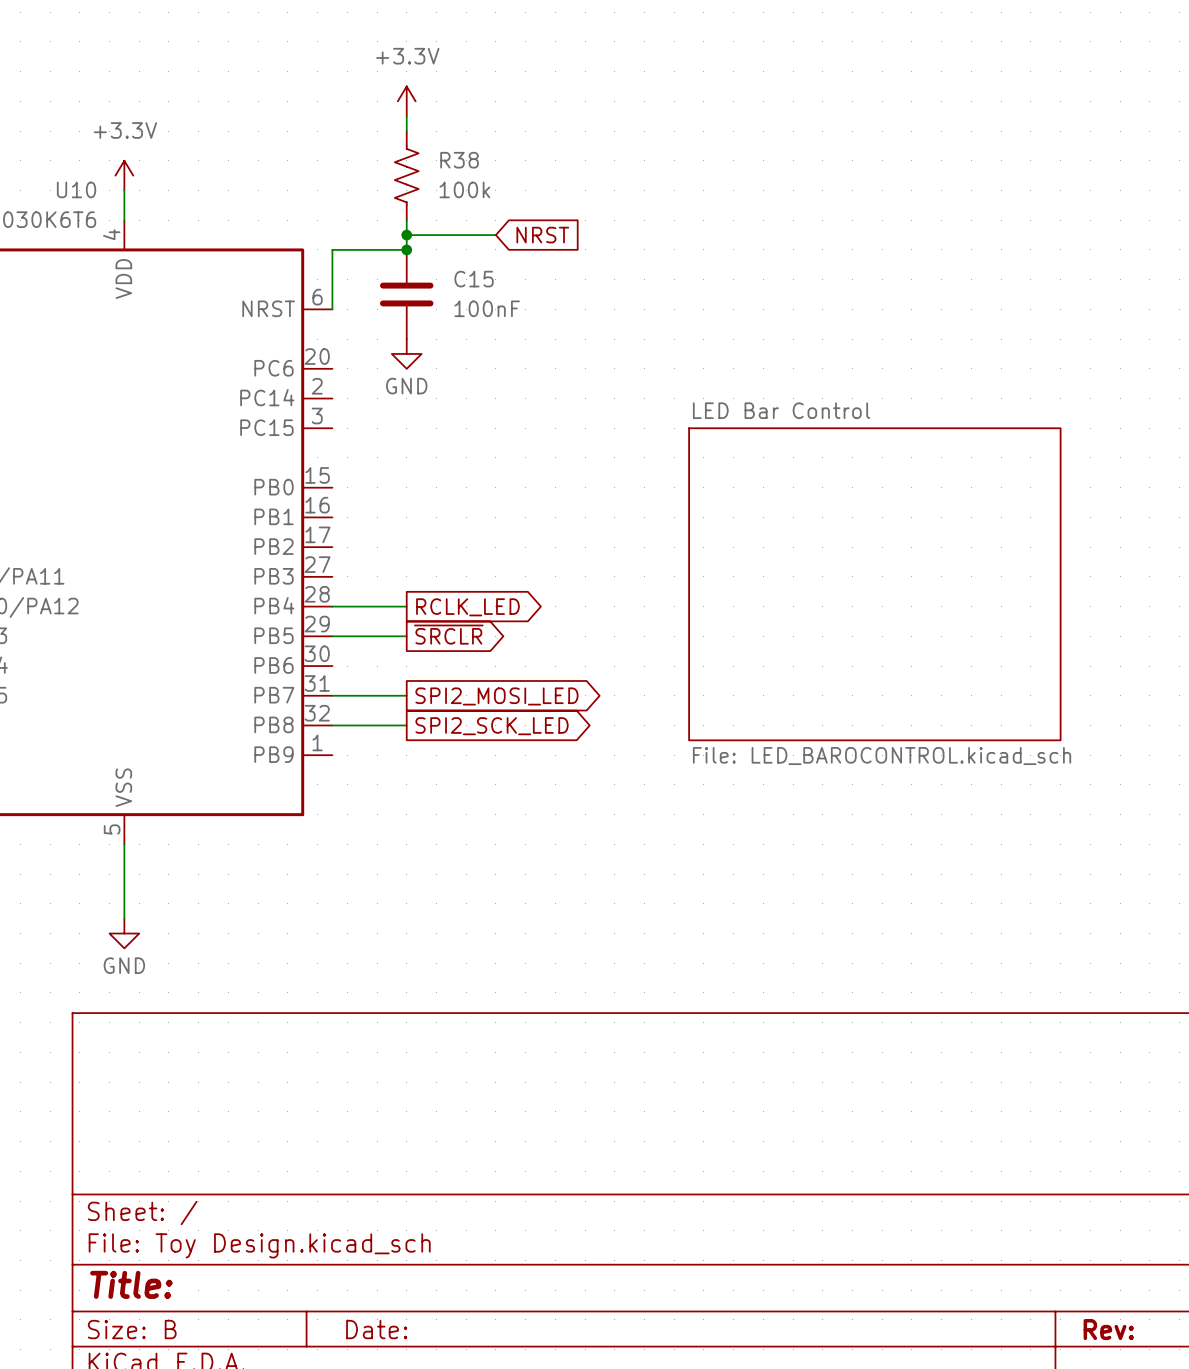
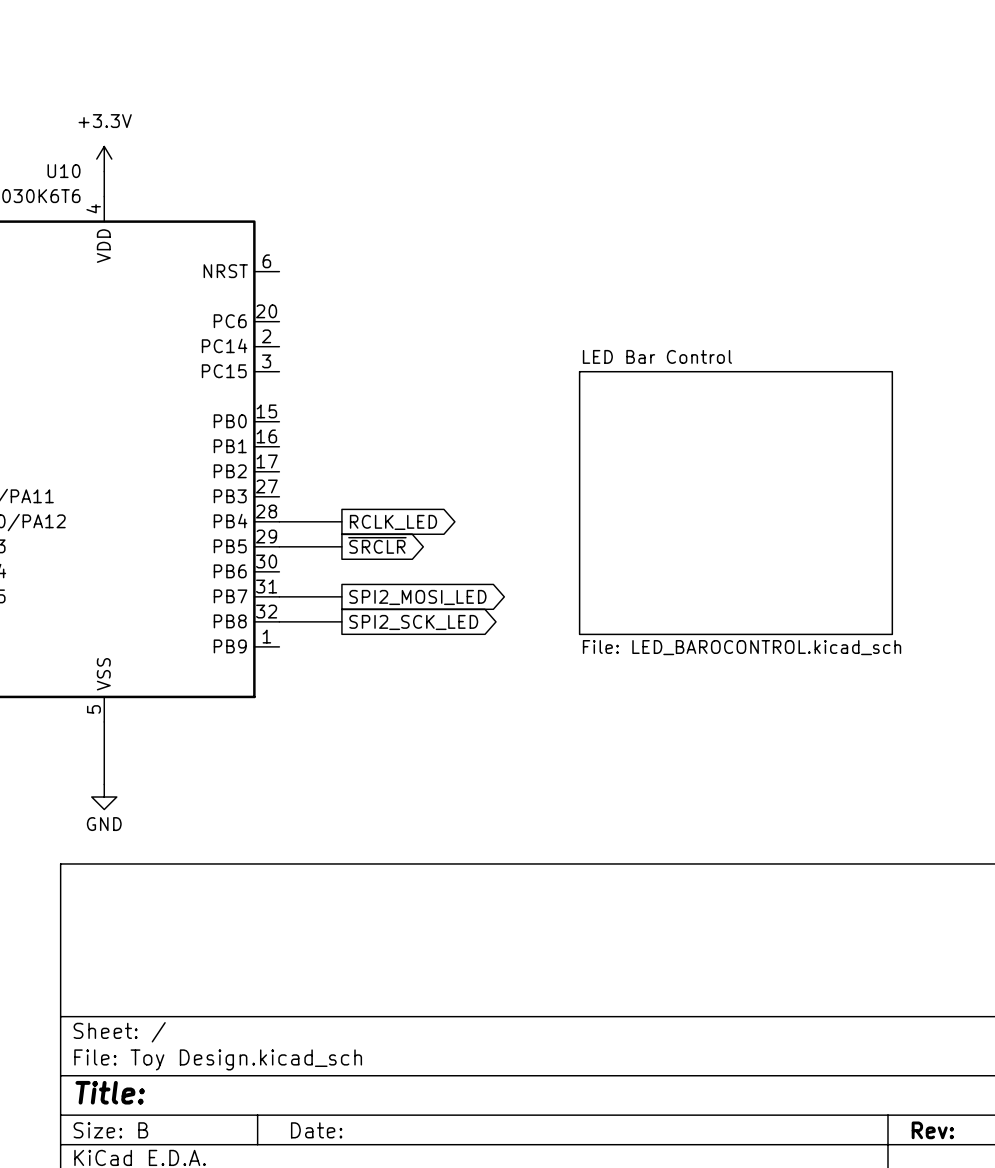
power symbol: +3.3V (406, 101) -> none
wire: (406, 116) (406, 131) -> none
R38: 100k (406, 175) -> none
wire: (406, 220) (406, 249) (332, 249) (332, 309) -> none
wire: (406, 235) (495, 235) -> none
junction: (406, 235) -> none
global label: NRST (542, 235) -> none
junction: (406, 249) -> none
C15: 100nF (406, 294) -> none
power symbol: GND (406, 353) -> none

